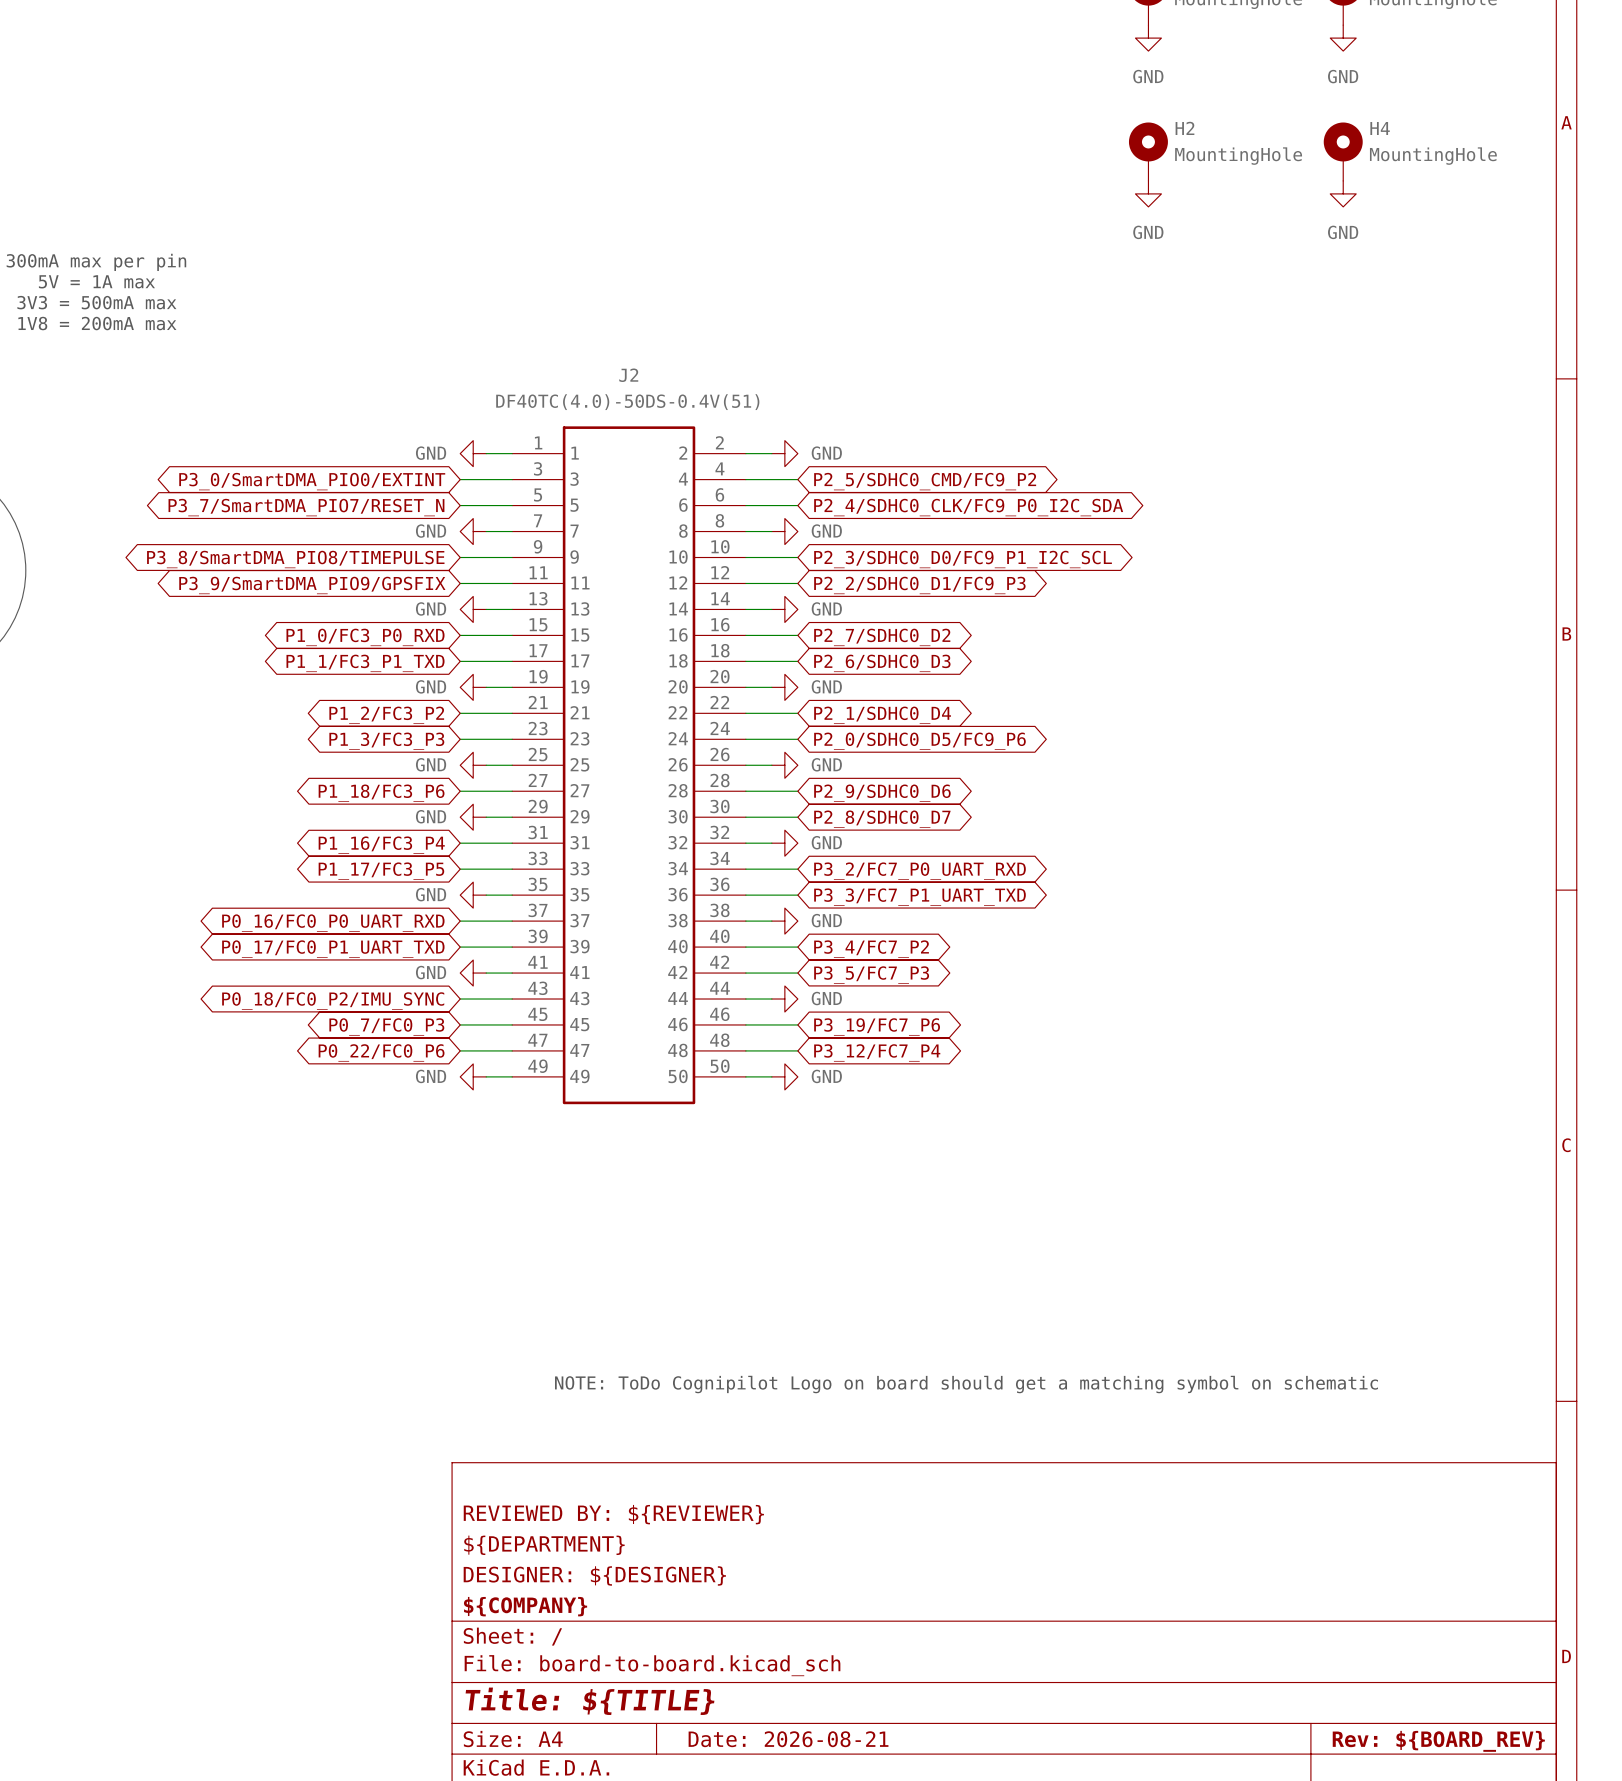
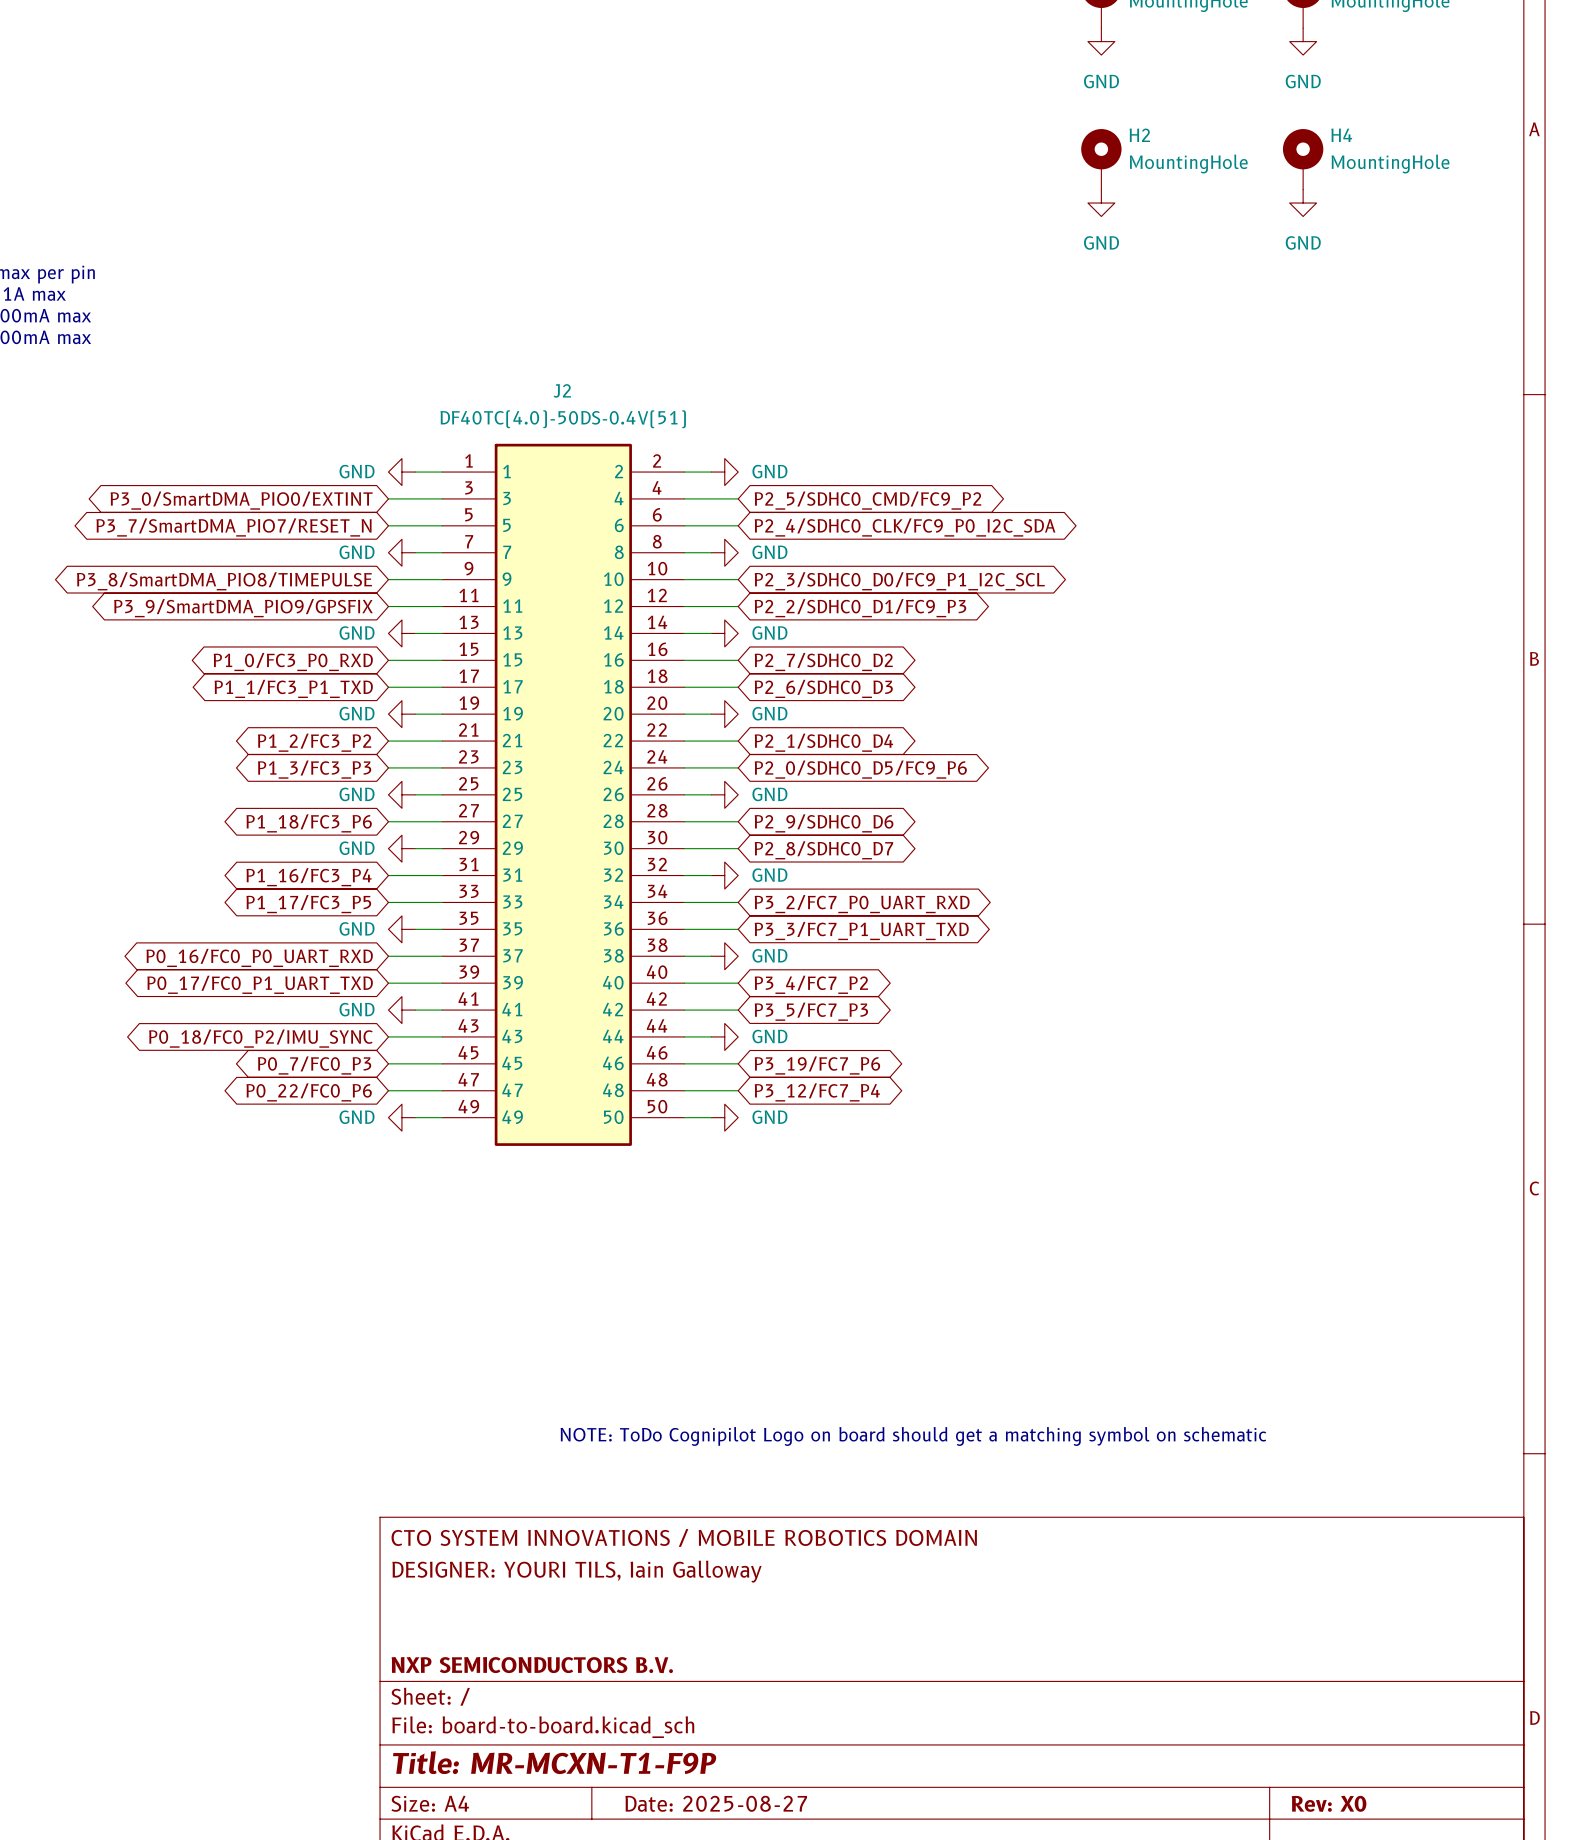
title block: none -> CTO SYSTEM INNOVATIONS / MOBILE ROBOTICS DOMAIN (684, 1537)
title block: REVIEWED BY: ${REVIEWER} (613, 1514) -> DESIGNER: YOURI TILS, Iain Galloway (577, 1571)
title block: ${DEPARTMENT} (544, 1545) -> none
title block: DESIGNER: ${DESIGNER} (594, 1575) -> none
title block: ${COMPANY} (525, 1606) -> NXP SEMICONDUCTORS B.V. (532, 1665)
title block: Title: ${TITLE} (590, 1701) -> Title: MR-MCXN-T1-F9P (554, 1762)
title block: Date: 2026-08-21 (788, 1739) -> Date: 2025-08-27 (716, 1803)
title block: Rev: ${BOARD_REV} (1438, 1741) -> Rev: X0 (1329, 1803)

